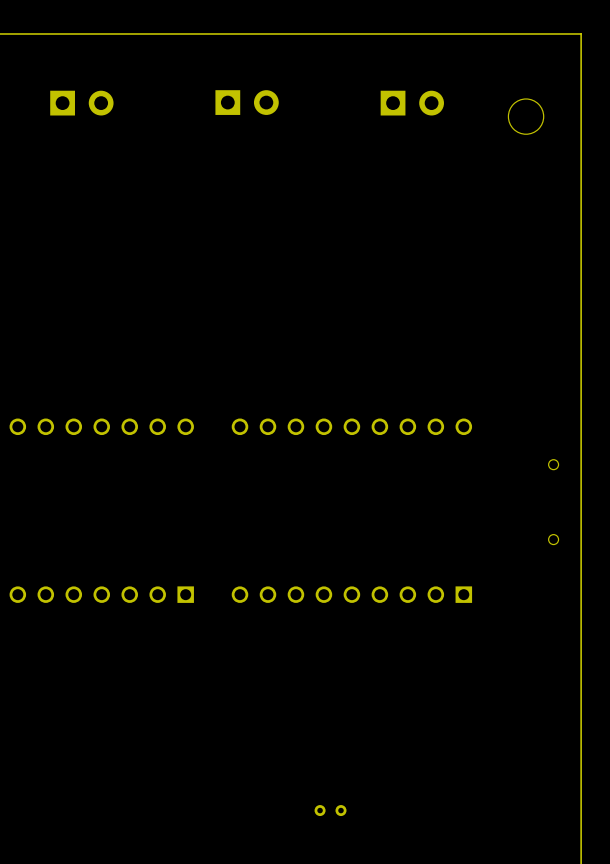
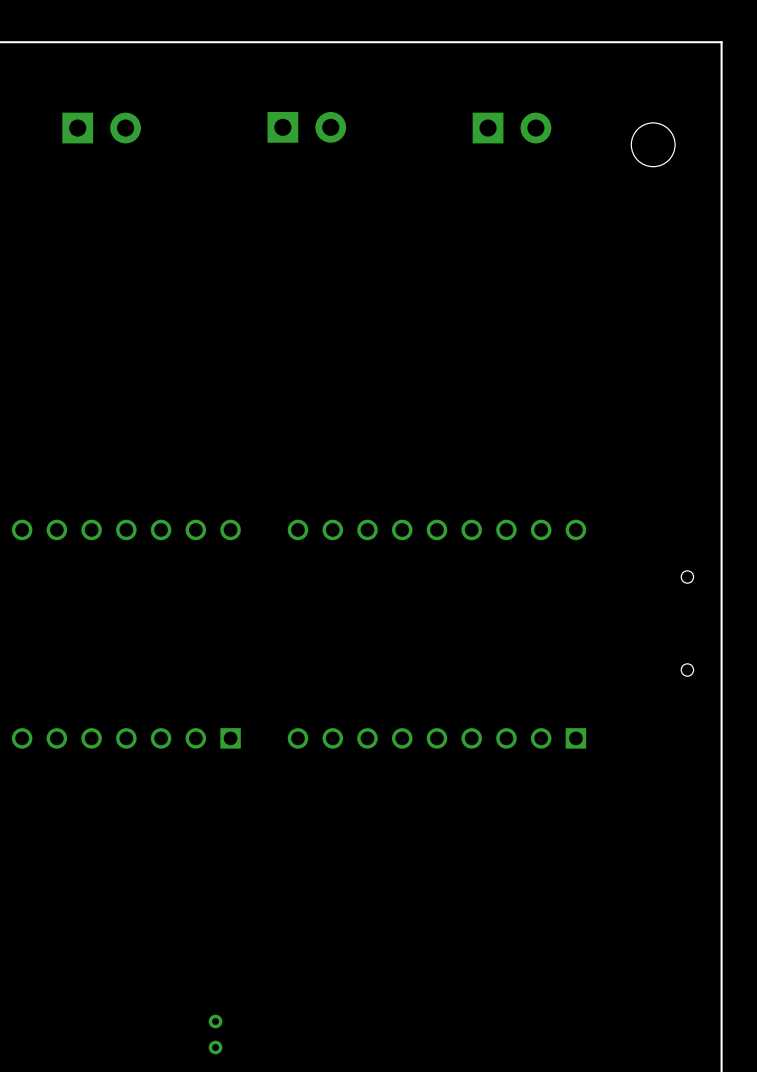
part rotation: 0° (330, 810) -> 90° clockwise (215, 1034)
part position: (330, 810) -> (215, 1034)

